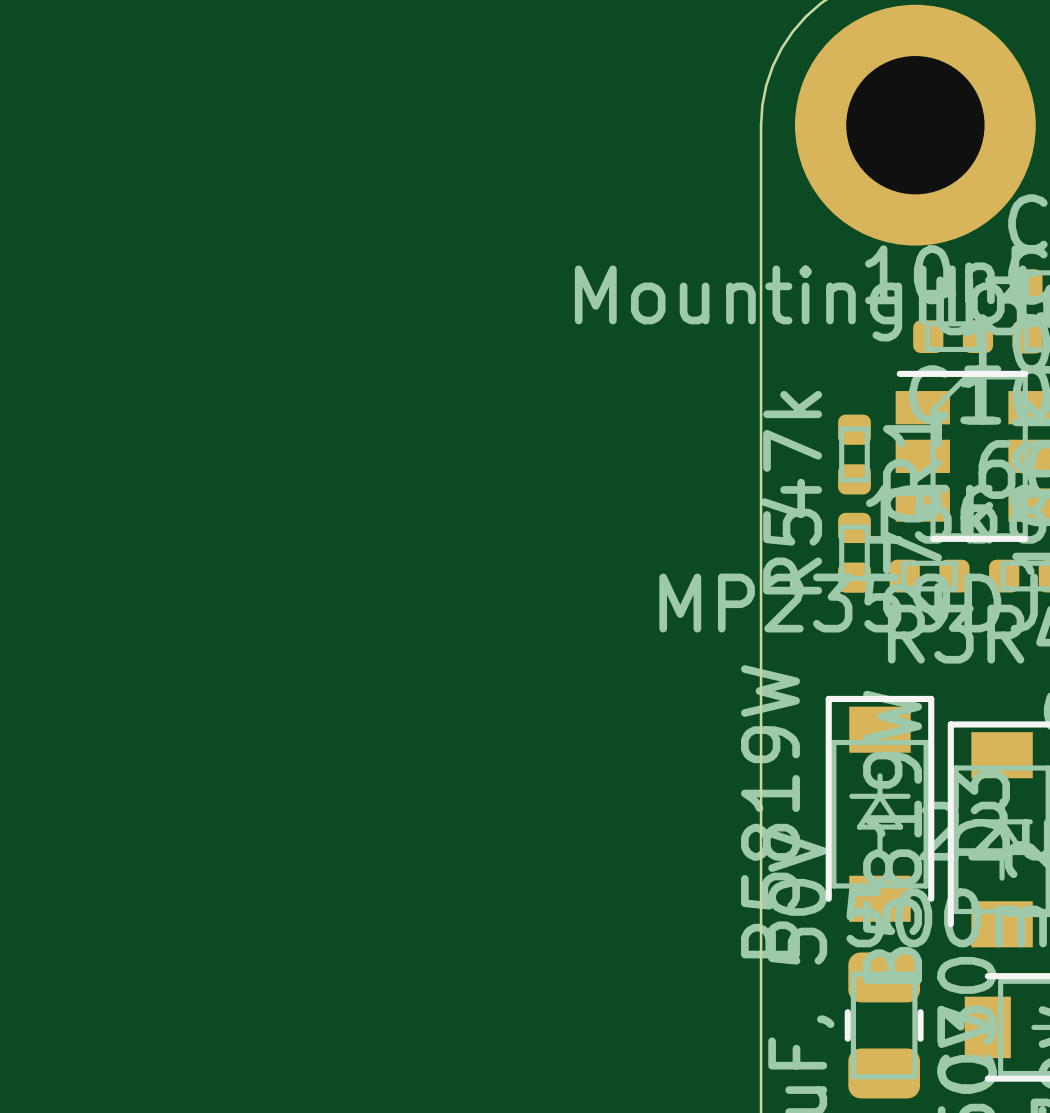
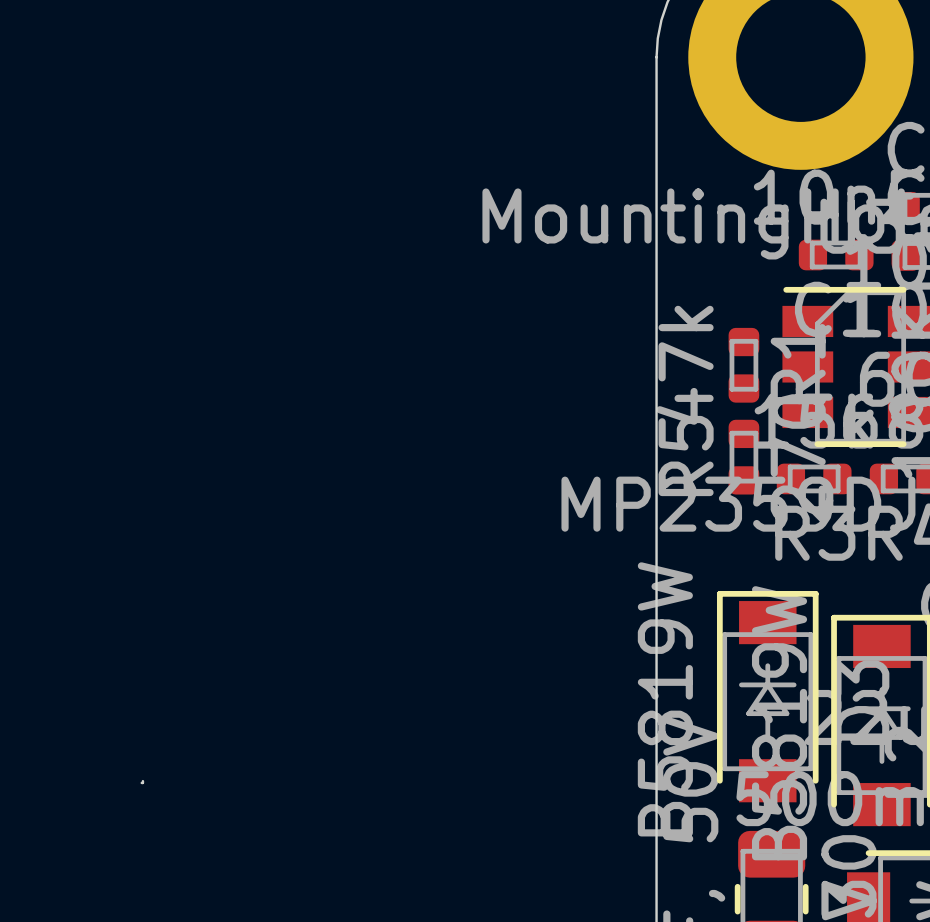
board edge: none -> (142, 781) (141, 782)

